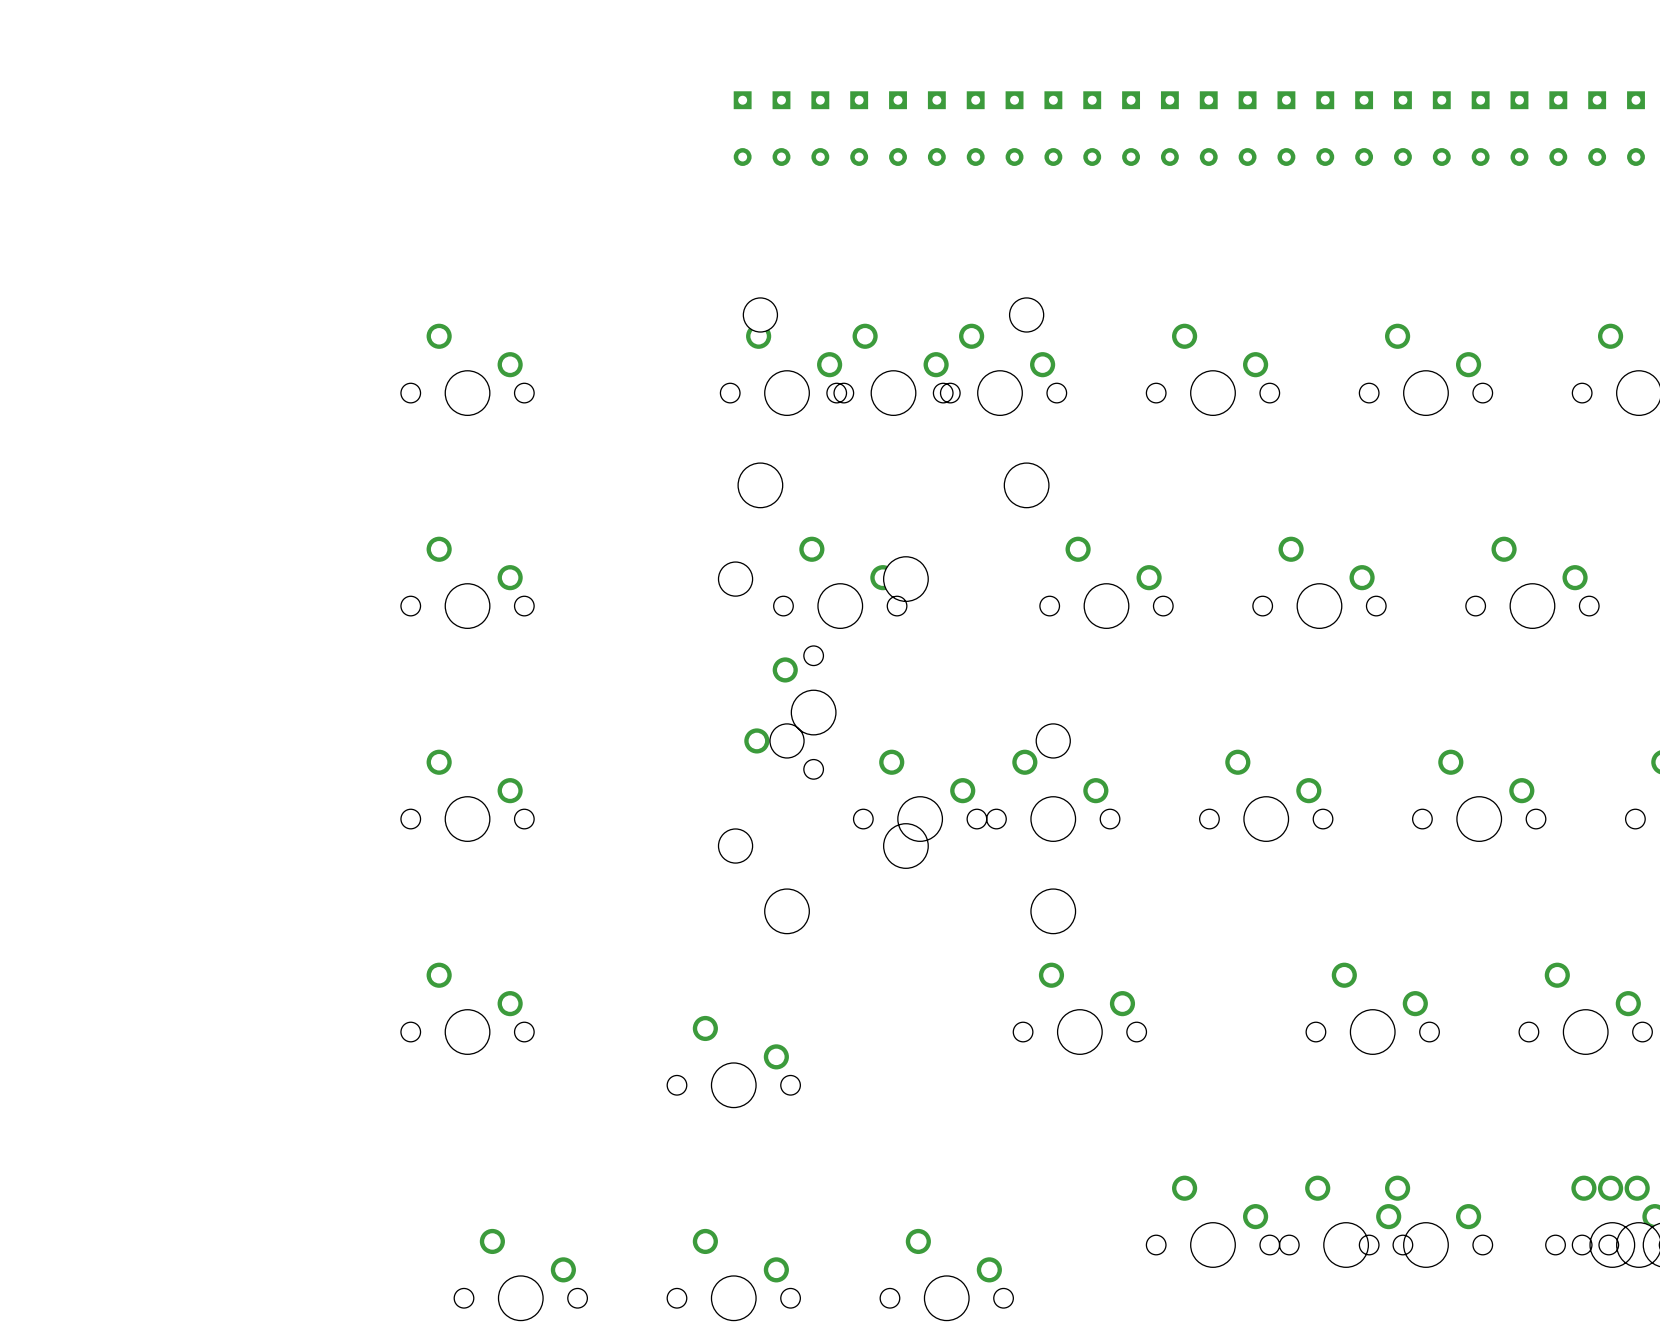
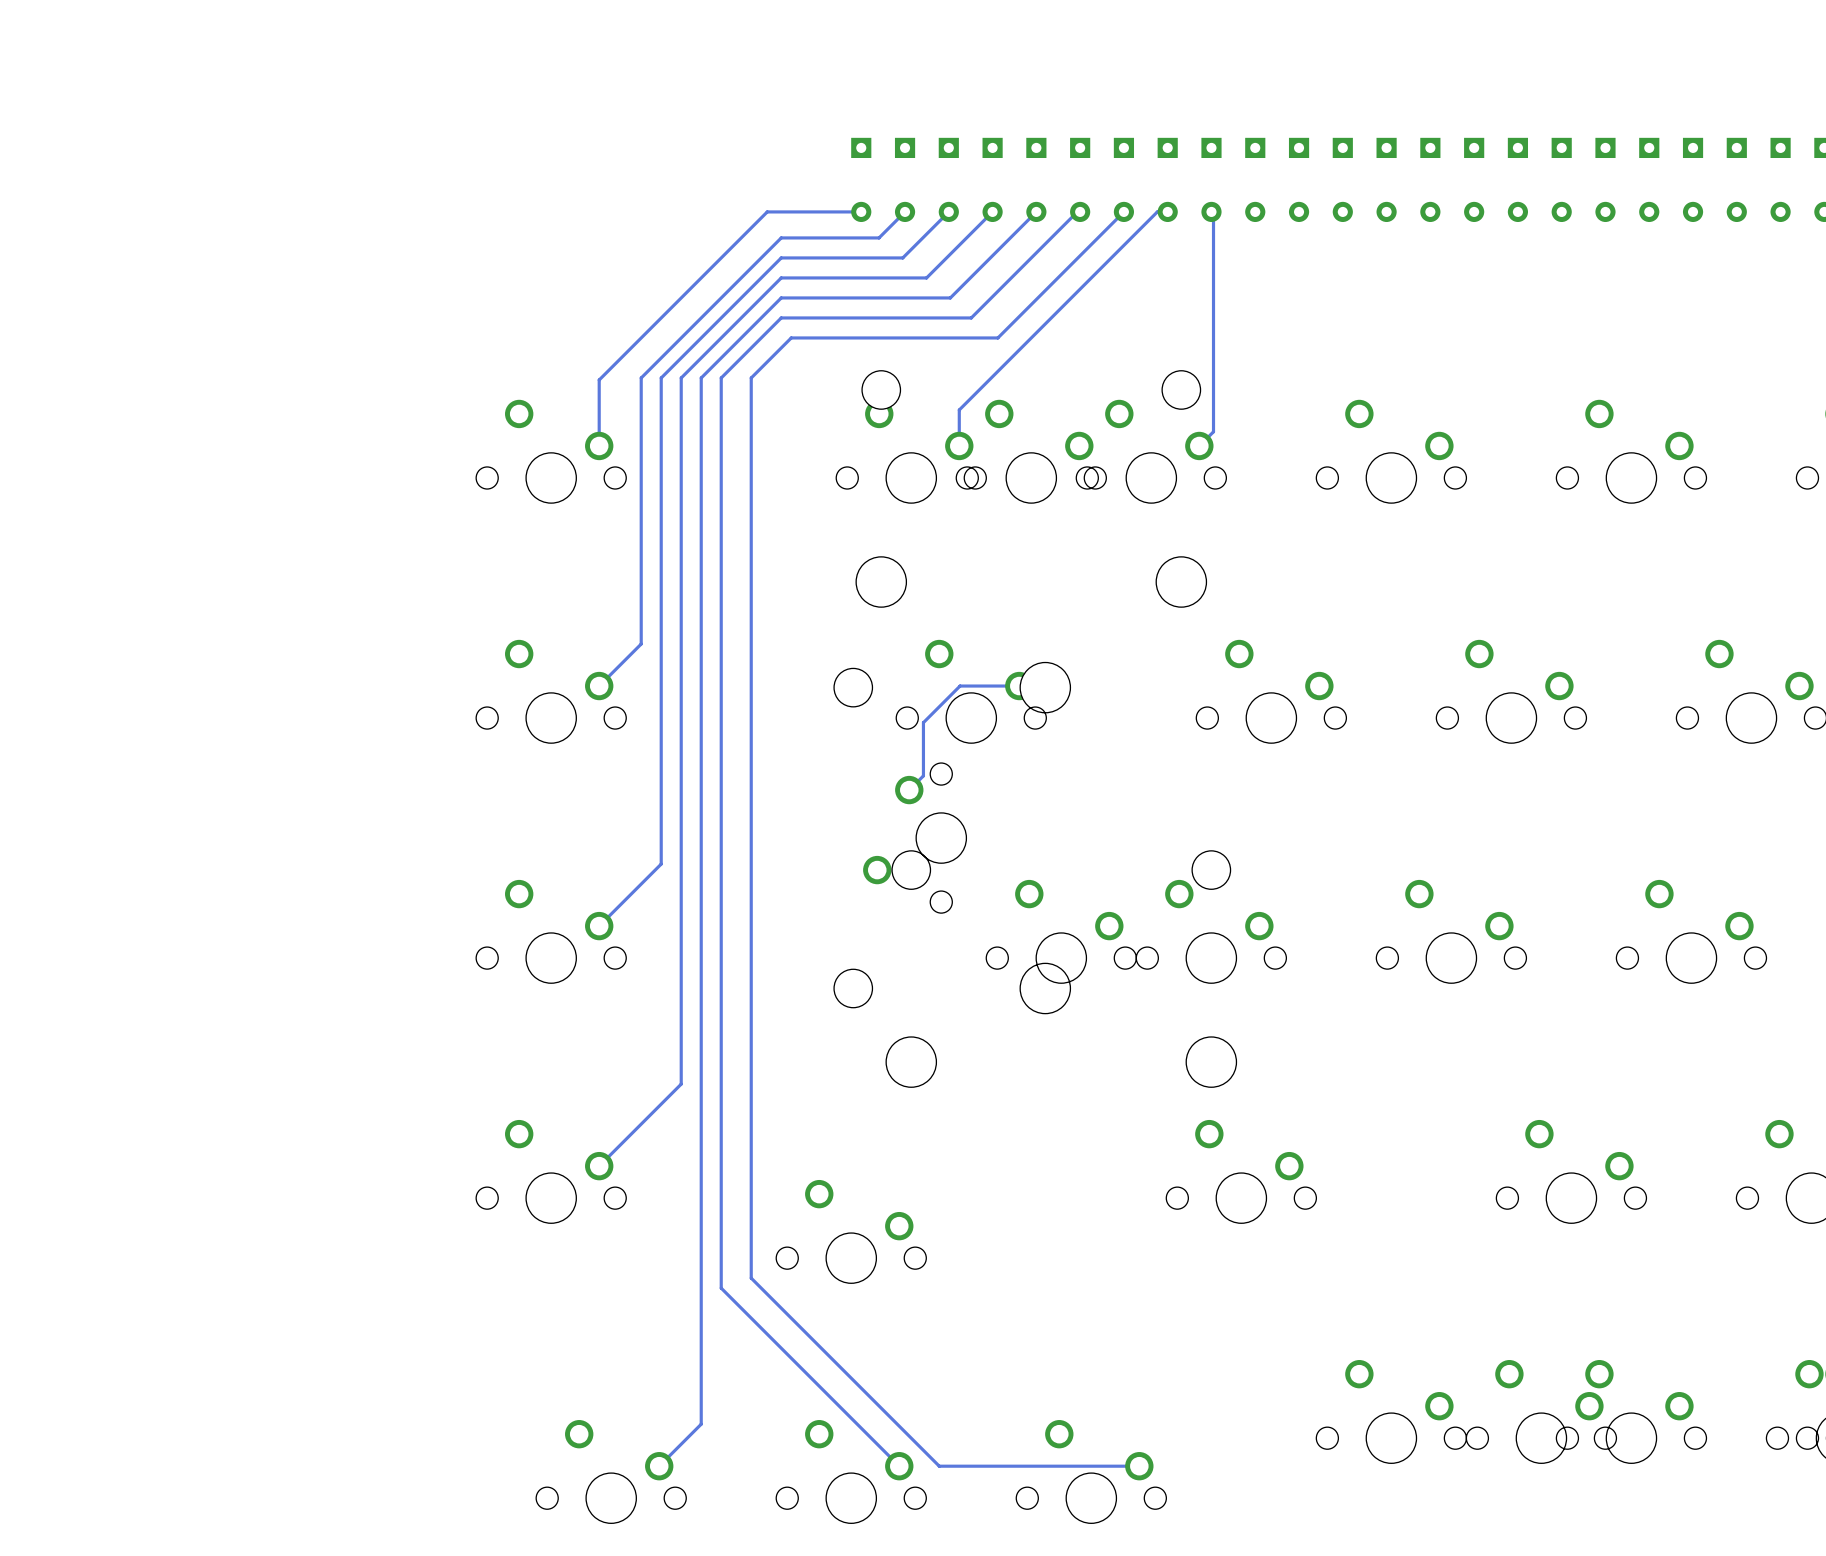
track: none -> (861, 211) (767, 211) (599, 379) (599, 445)
track: none -> (905, 211) (879, 237) (781, 237) (641, 377) (641, 644) (599, 686)
track: none -> (948, 211) (902, 257) (781, 257) (661, 377) (661, 864) (599, 926)
track: none -> (992, 211) (926, 277) (781, 277) (681, 377) (681, 1084) (599, 1166)
track: none -> (1036, 211) (950, 297) (781, 297) (701, 377) (701, 1424) (659, 1466)
track: none -> (1080, 211) (1077, 211) (971, 317) (781, 317) (721, 377) (721, 1288) (899, 1466)
track: none -> (1123, 211) (997, 337) (791, 337) (751, 377) (751, 1278) (939, 1466) (1139, 1466)
track: none -> (1167, 211) (1157, 211) (959, 409) (959, 445)
track: none -> (1211, 211) (1213, 213) (1213, 431) (1199, 445)
track: none -> (1016, 686) (960, 686) (923, 722) (923, 775) (909, 790)

